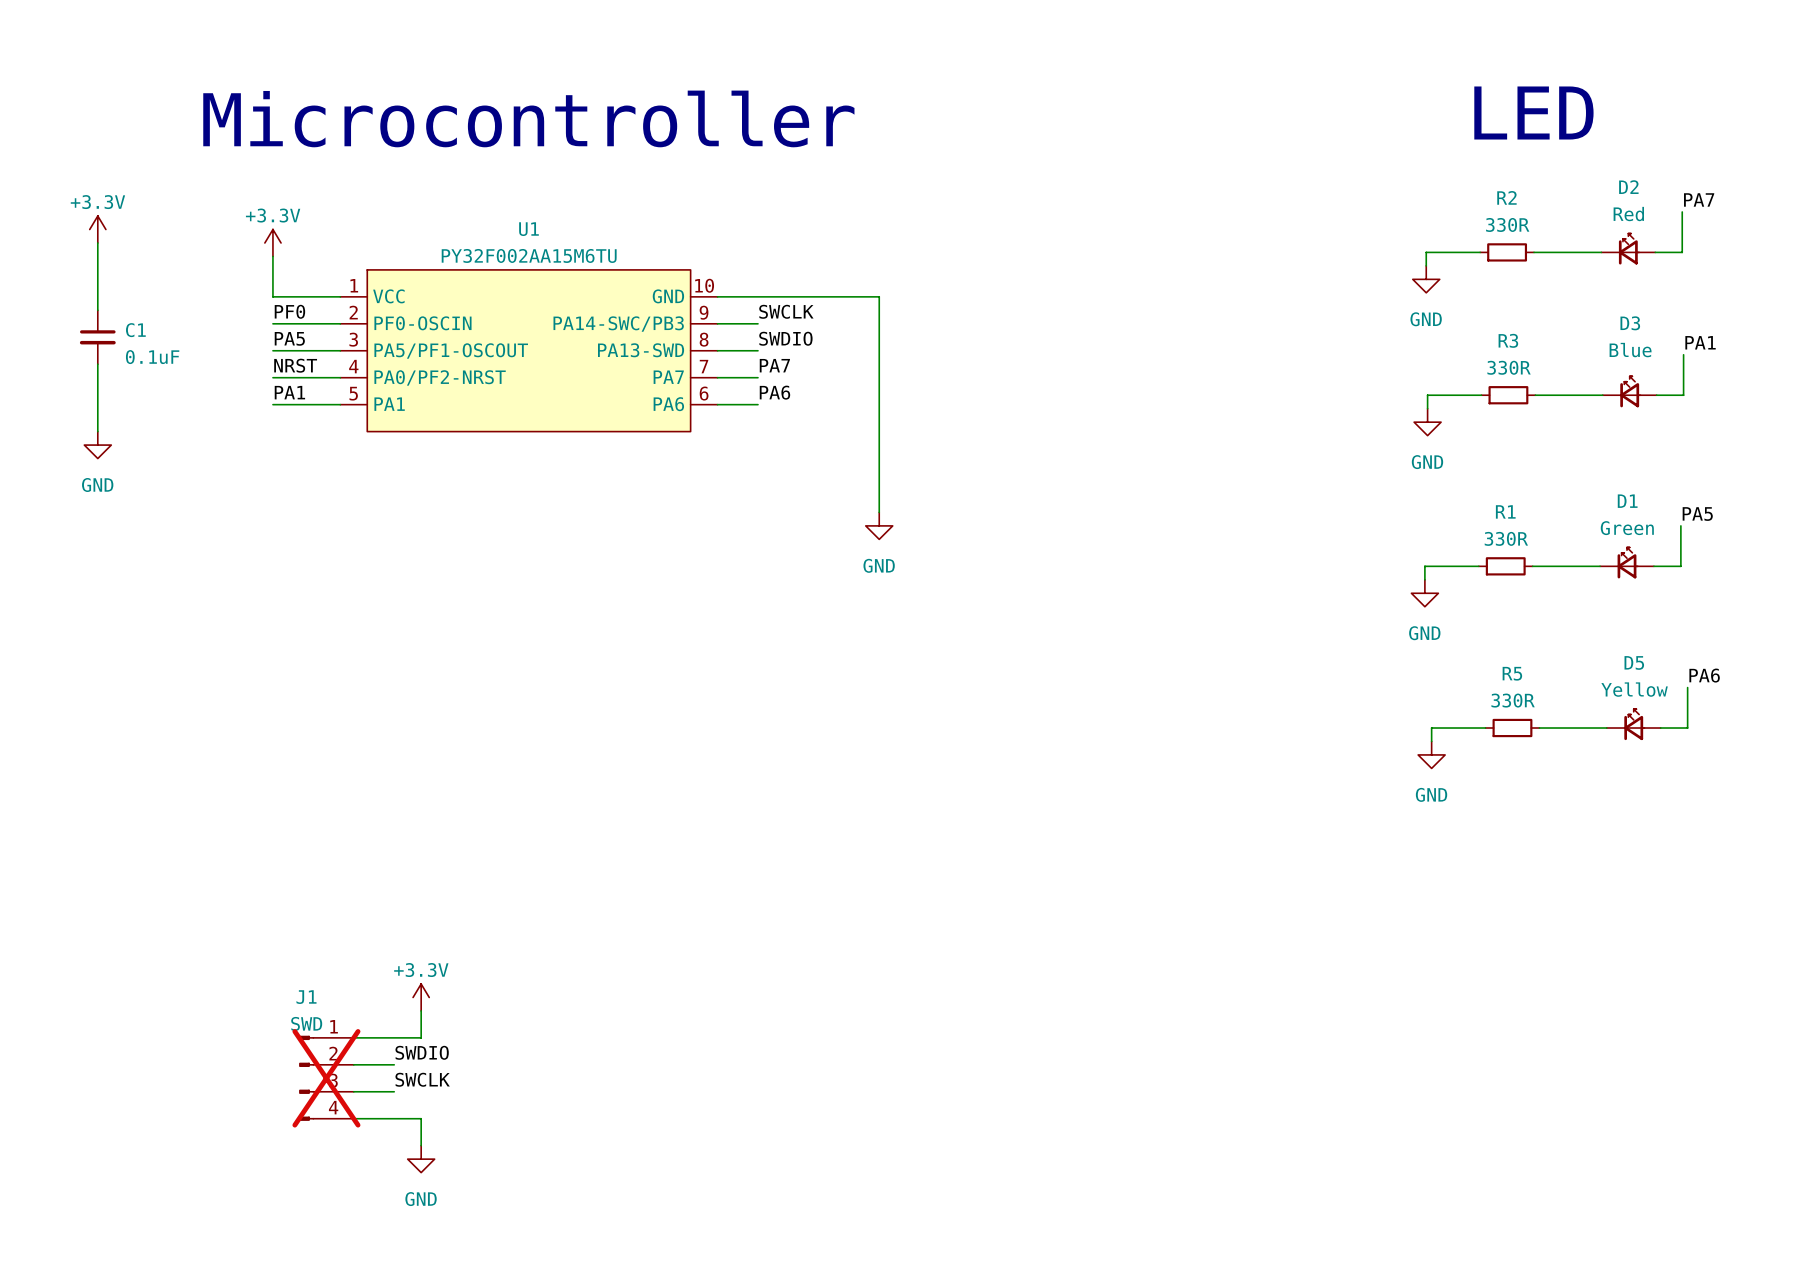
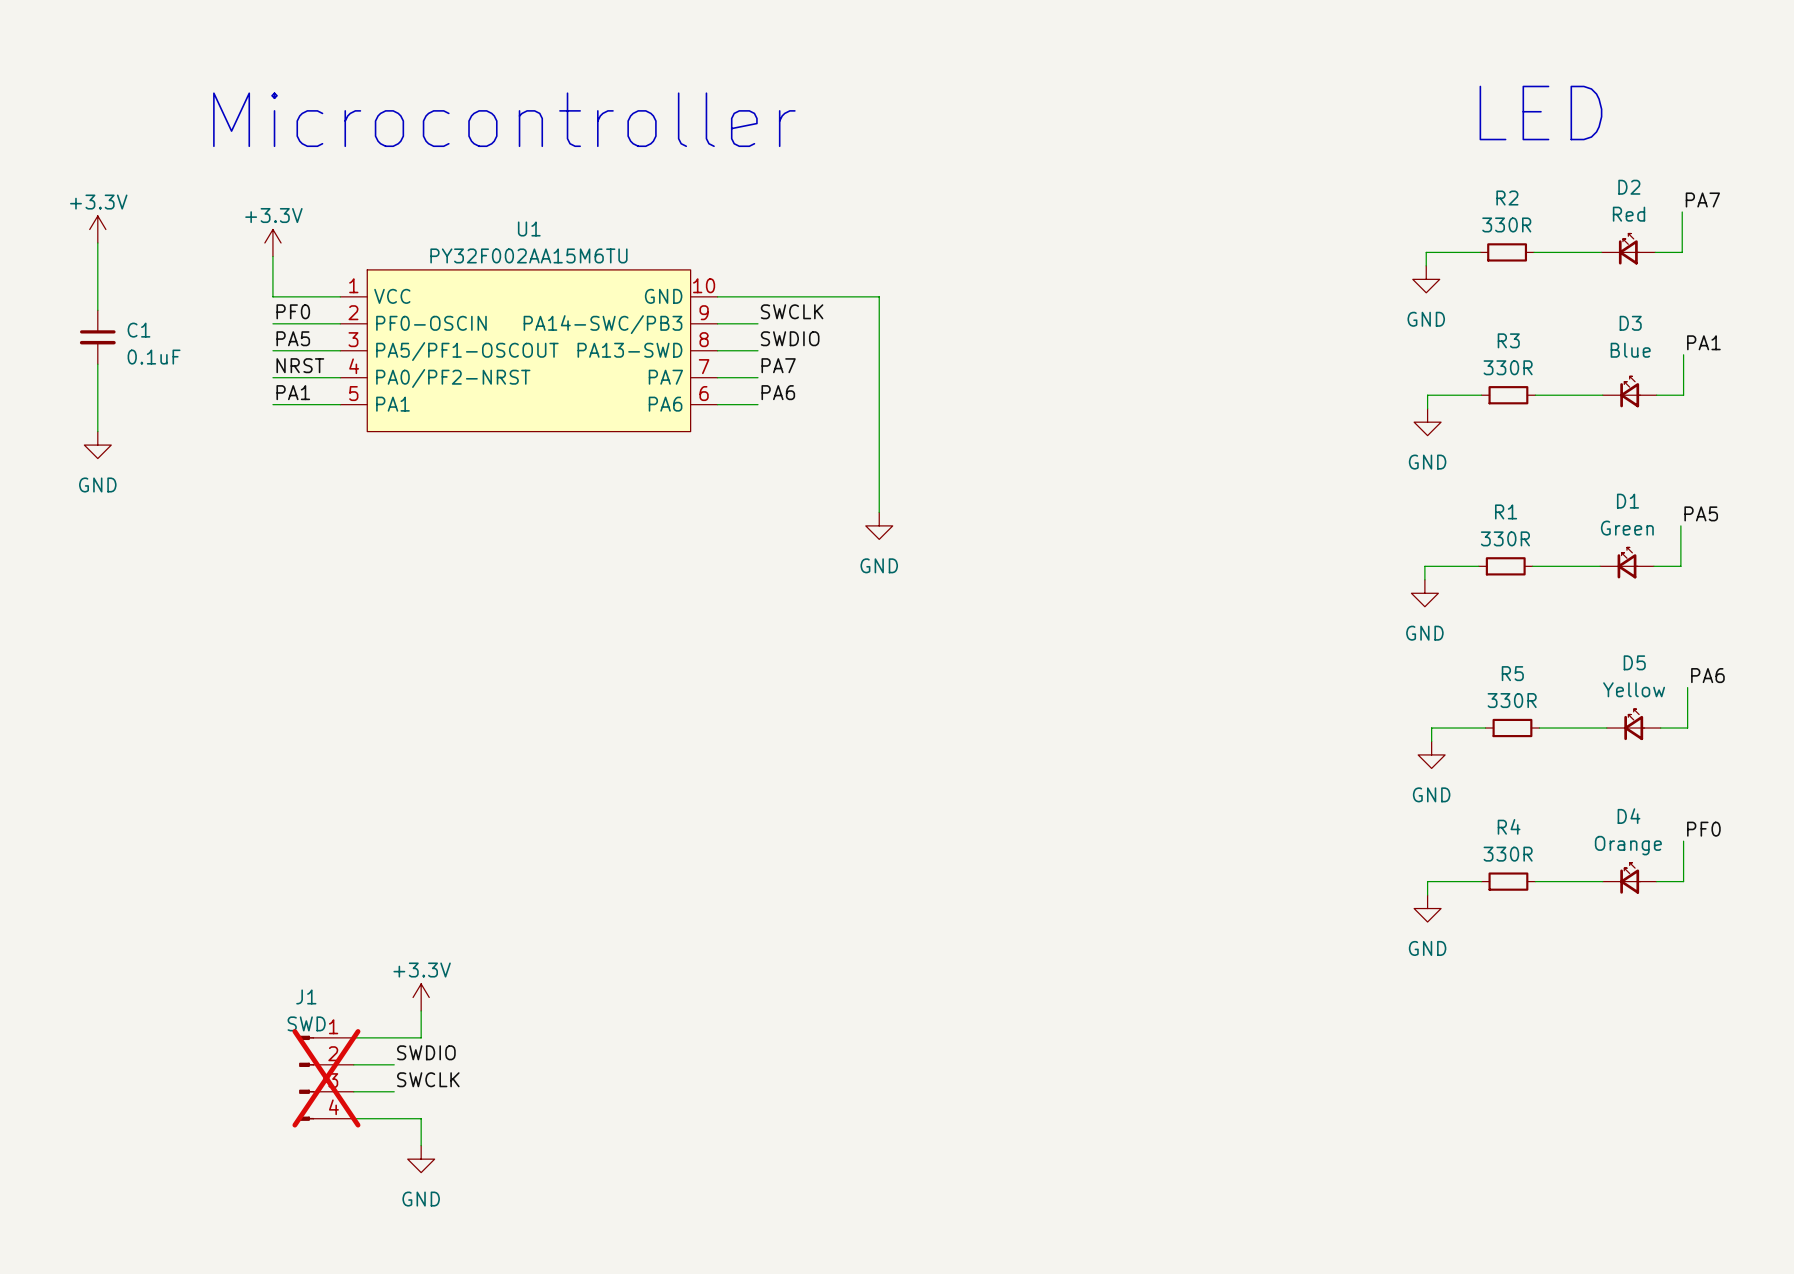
label: none -> PF0 (1703, 829)
wire: none -> (1683, 841) (1683, 881) (1656, 881)
D4: none -> Orange (1629, 878)
wire: none -> (1481, 881) (1427, 881) (1427, 895)
R4: none -> 330R (1508, 881)
wire: none -> (1535, 881) (1602, 881)
power symbol: none -> GND (1427, 908)

